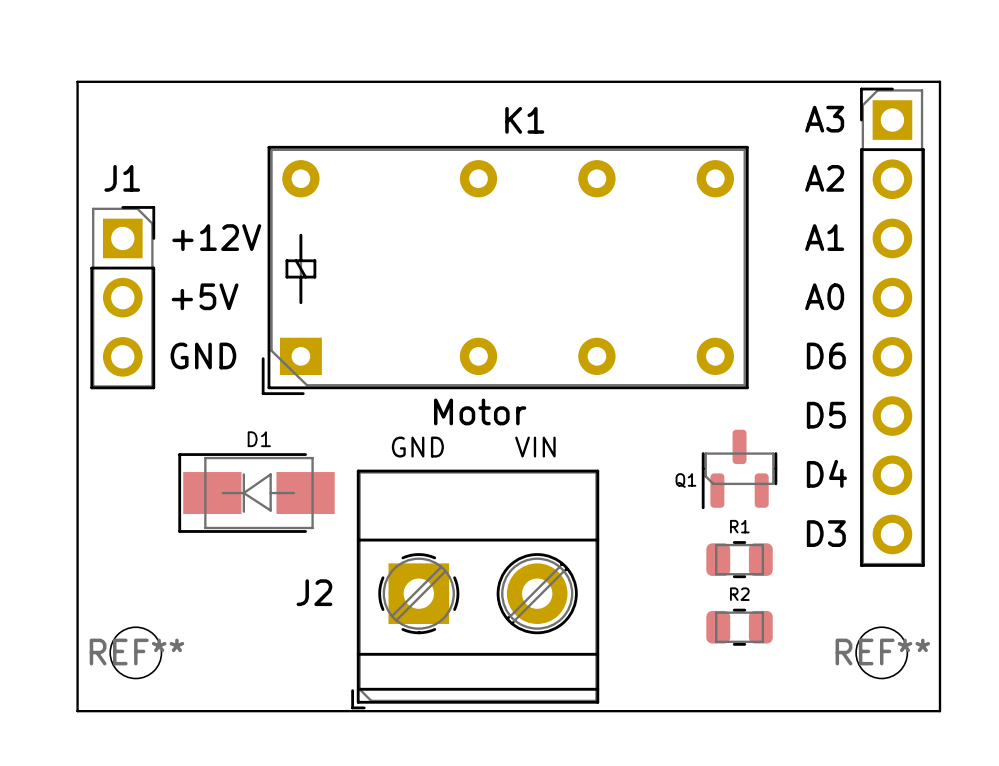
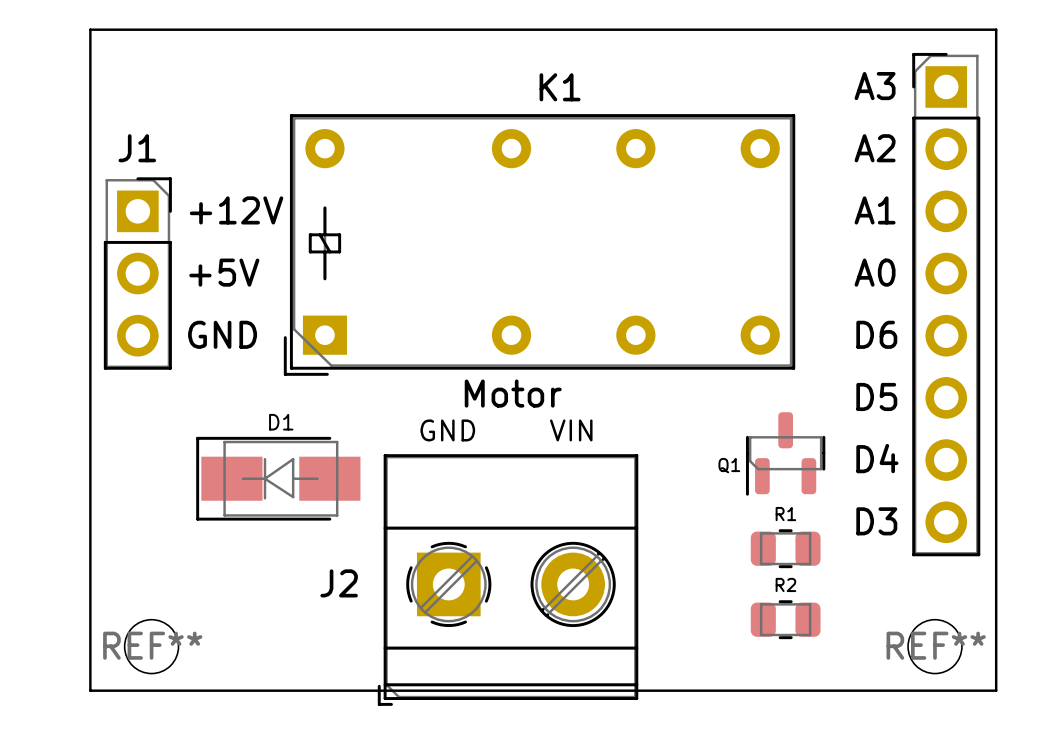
board edge: (77, 81) (939, 81) -> (90, 46) (90, 29) (996, 29) (996, 46)
board edge: (77, 694) (77, 711) (939, 711) (939, 694) -> (90, 690) (996, 690)

